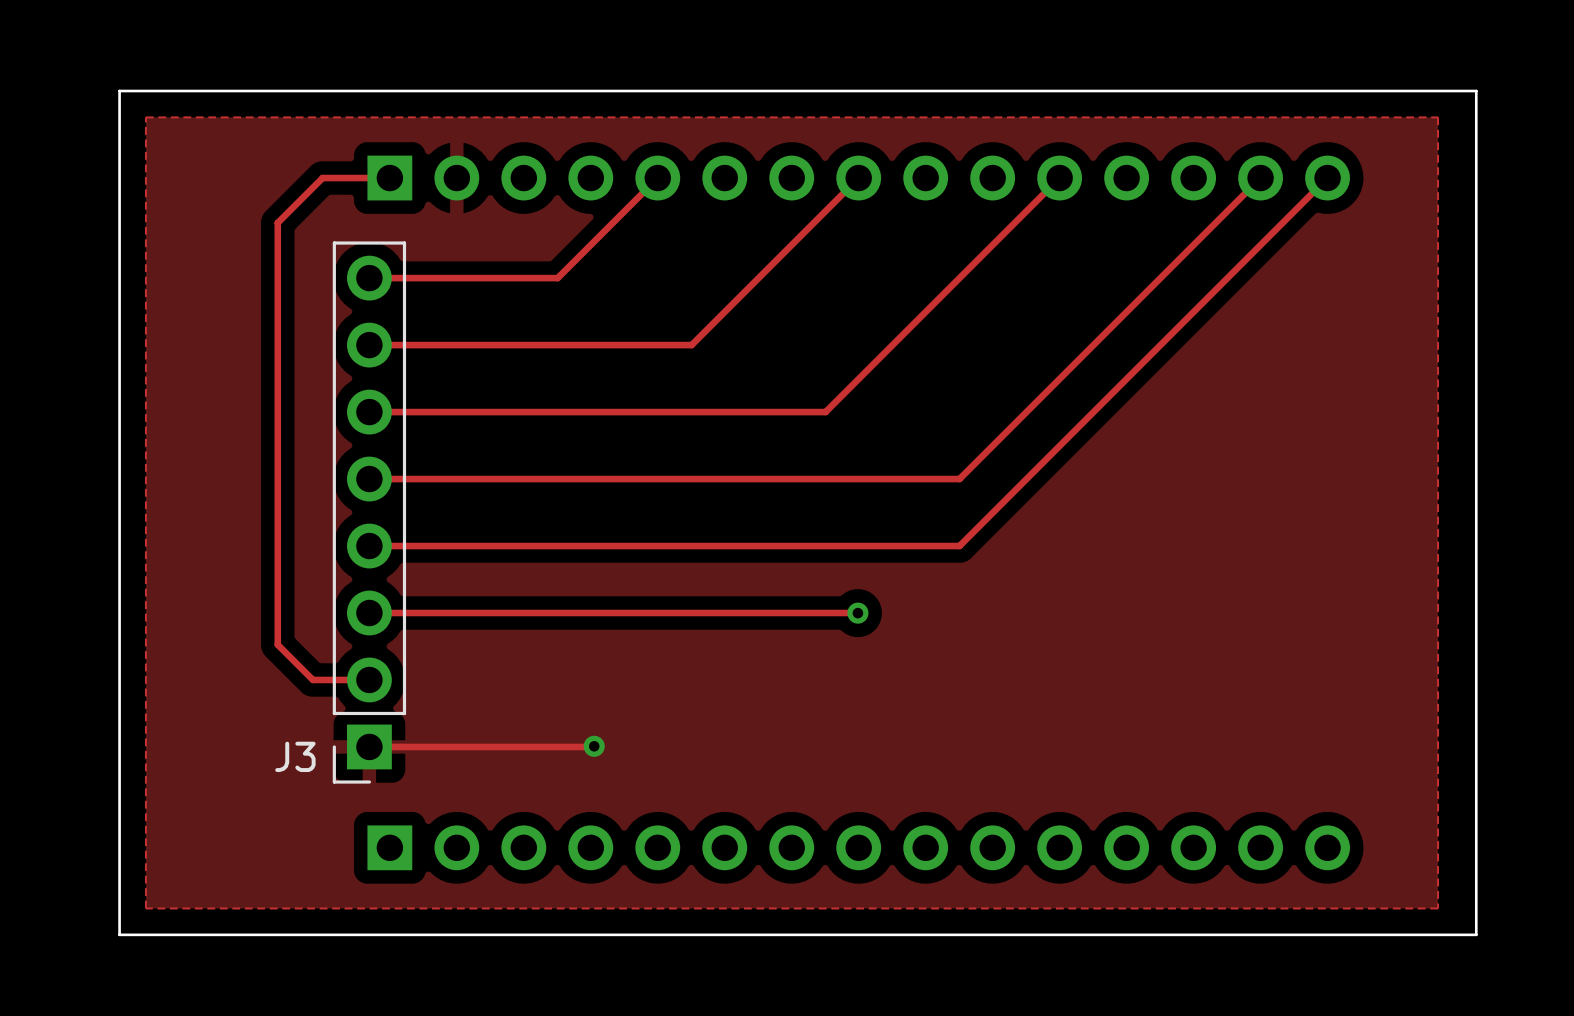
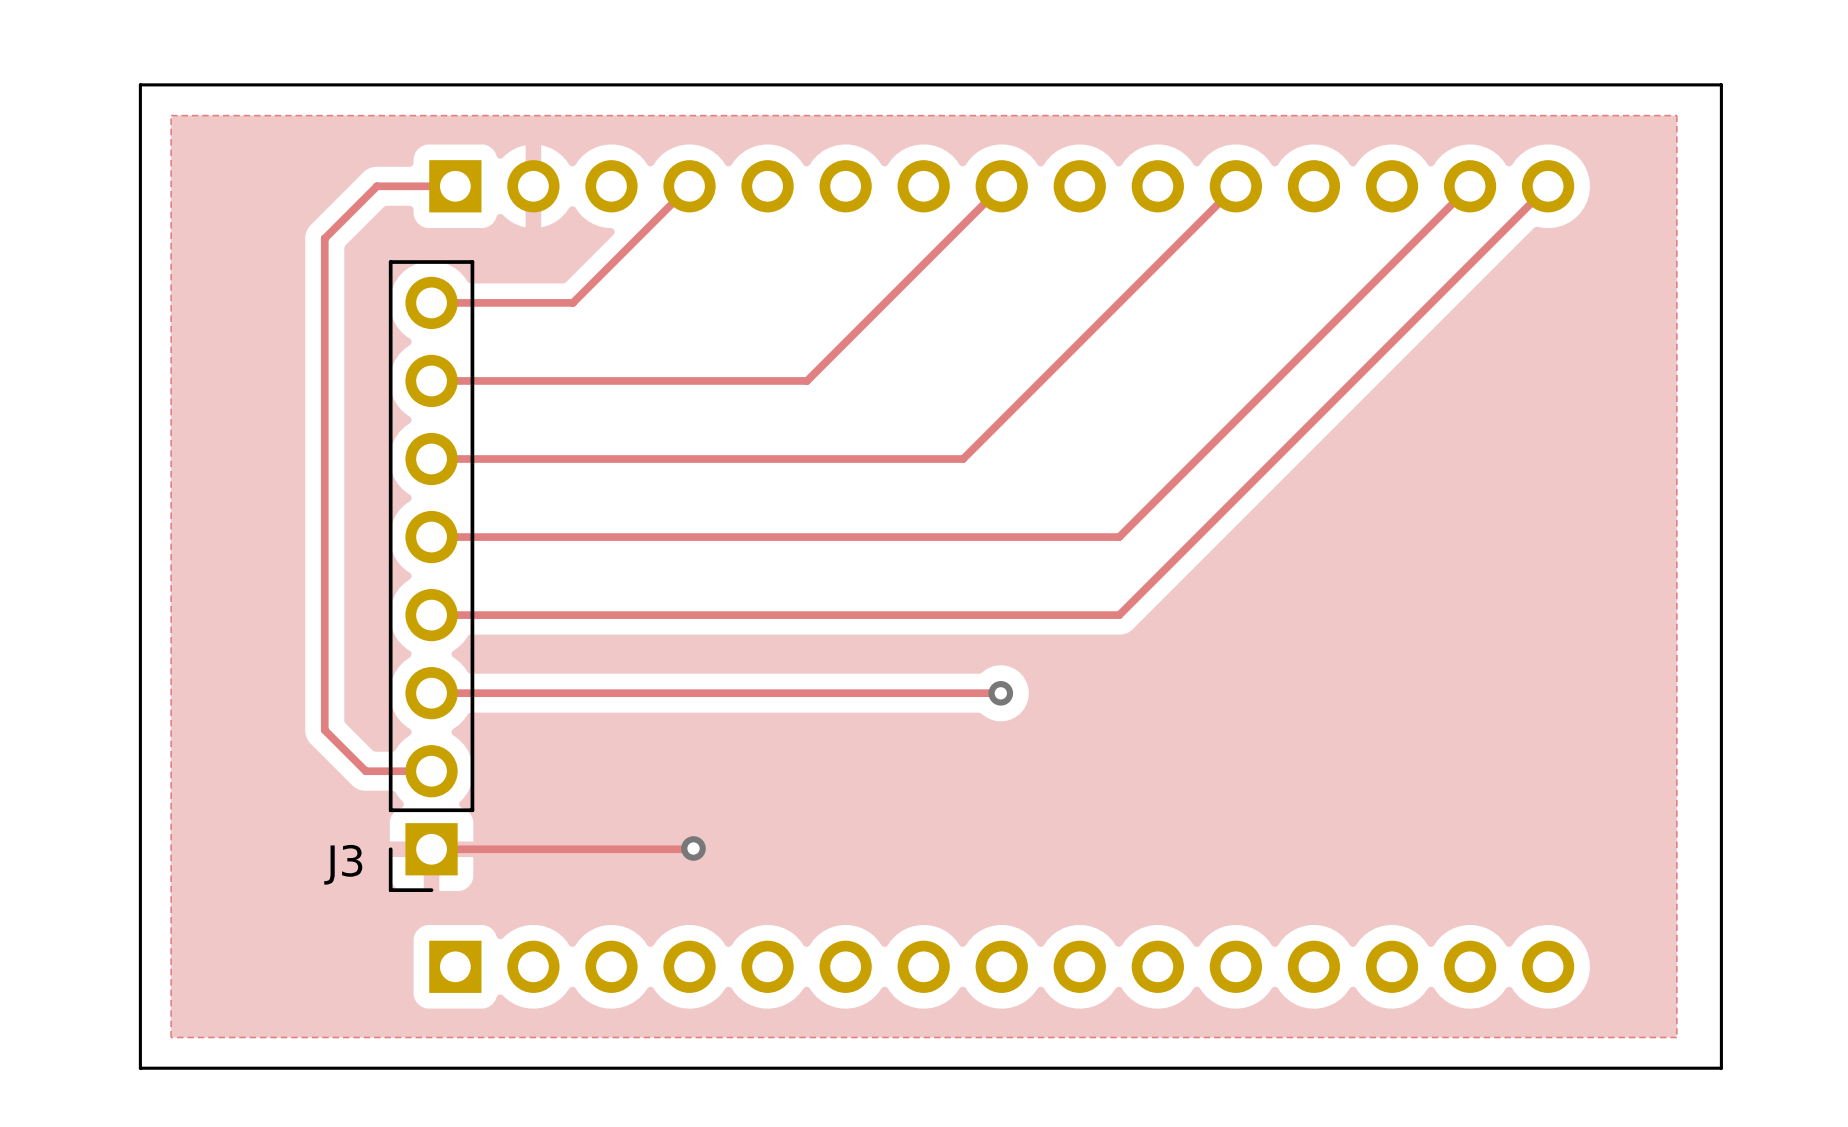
track: (657, 178) (557, 278) (490, 278) -> (689, 186) (572, 302)

